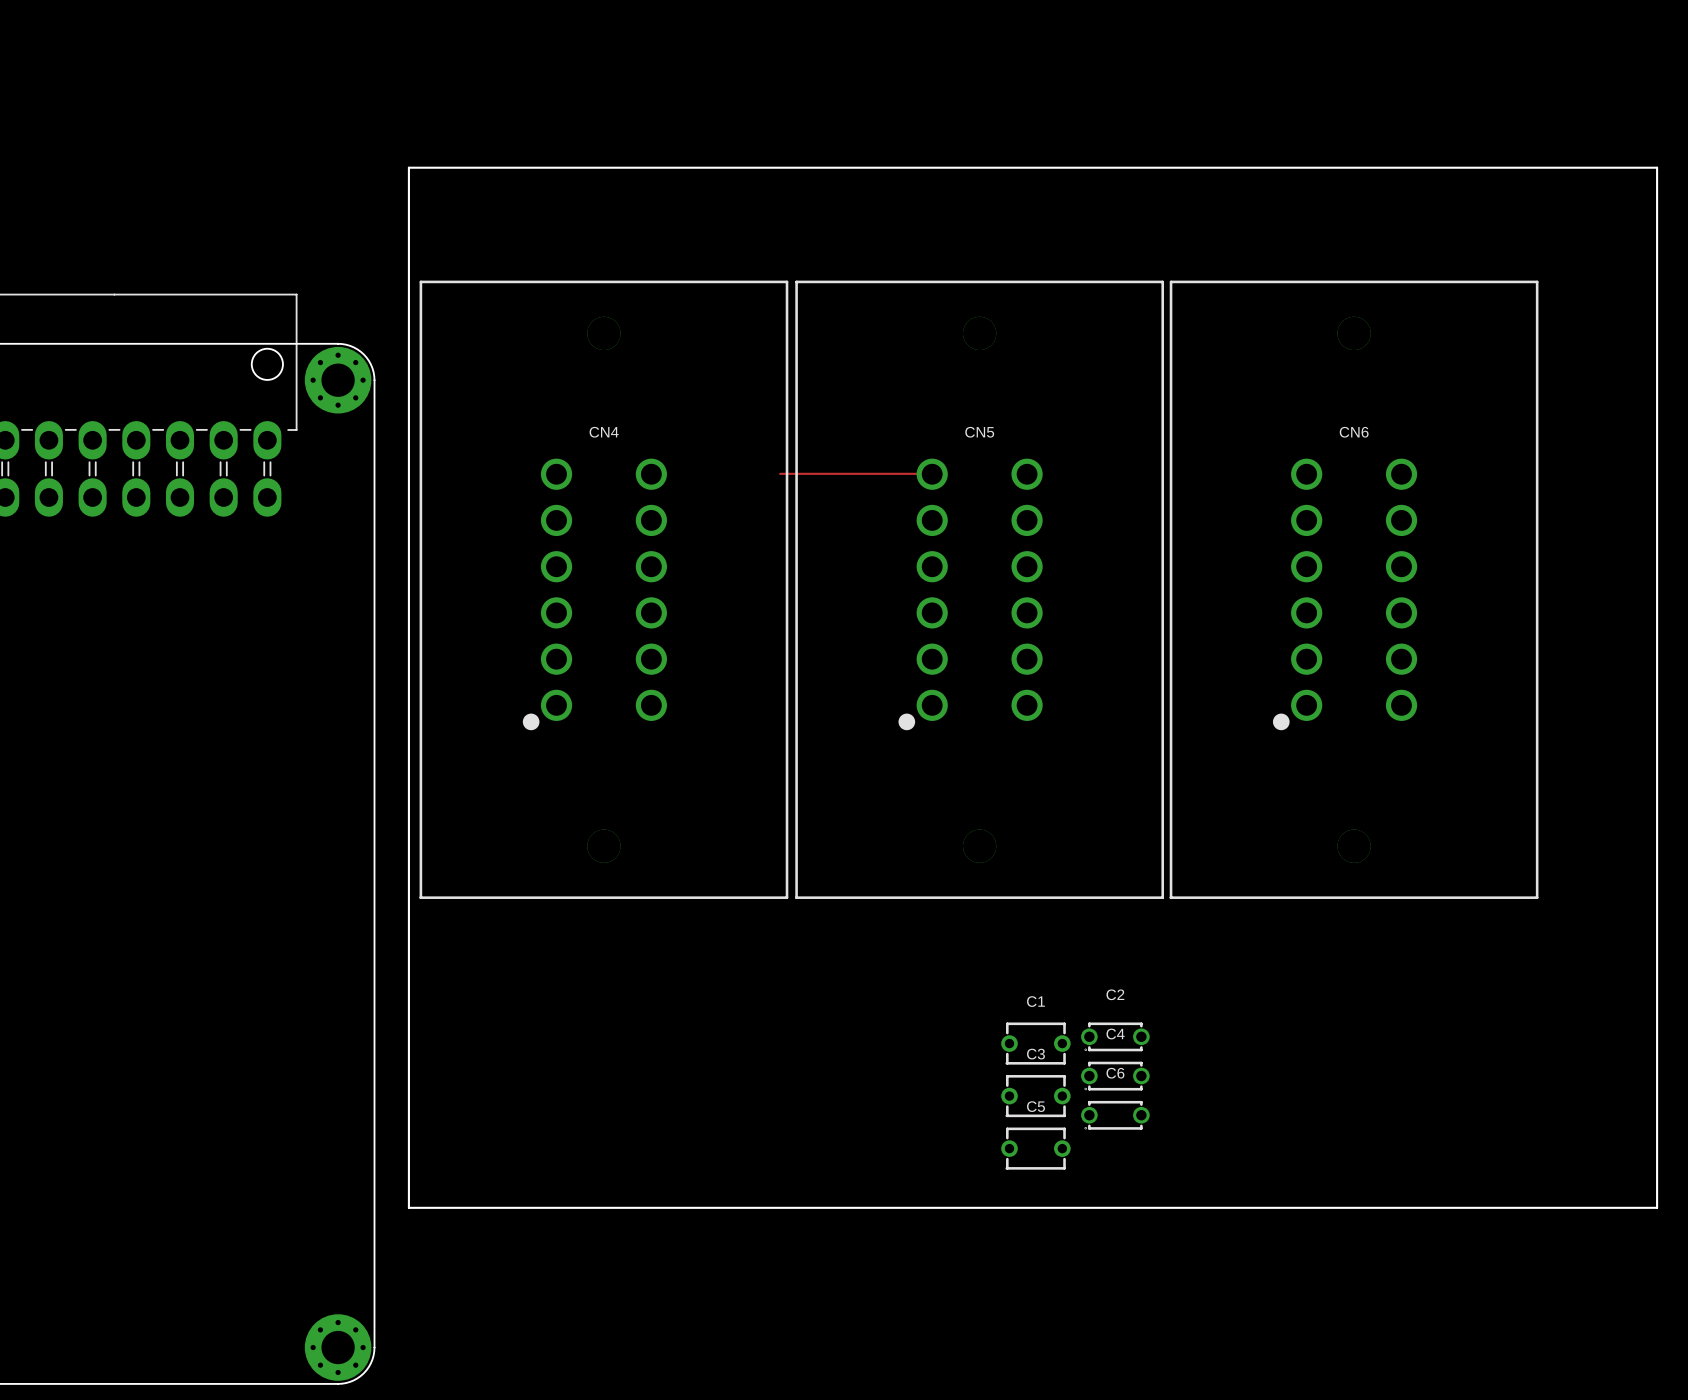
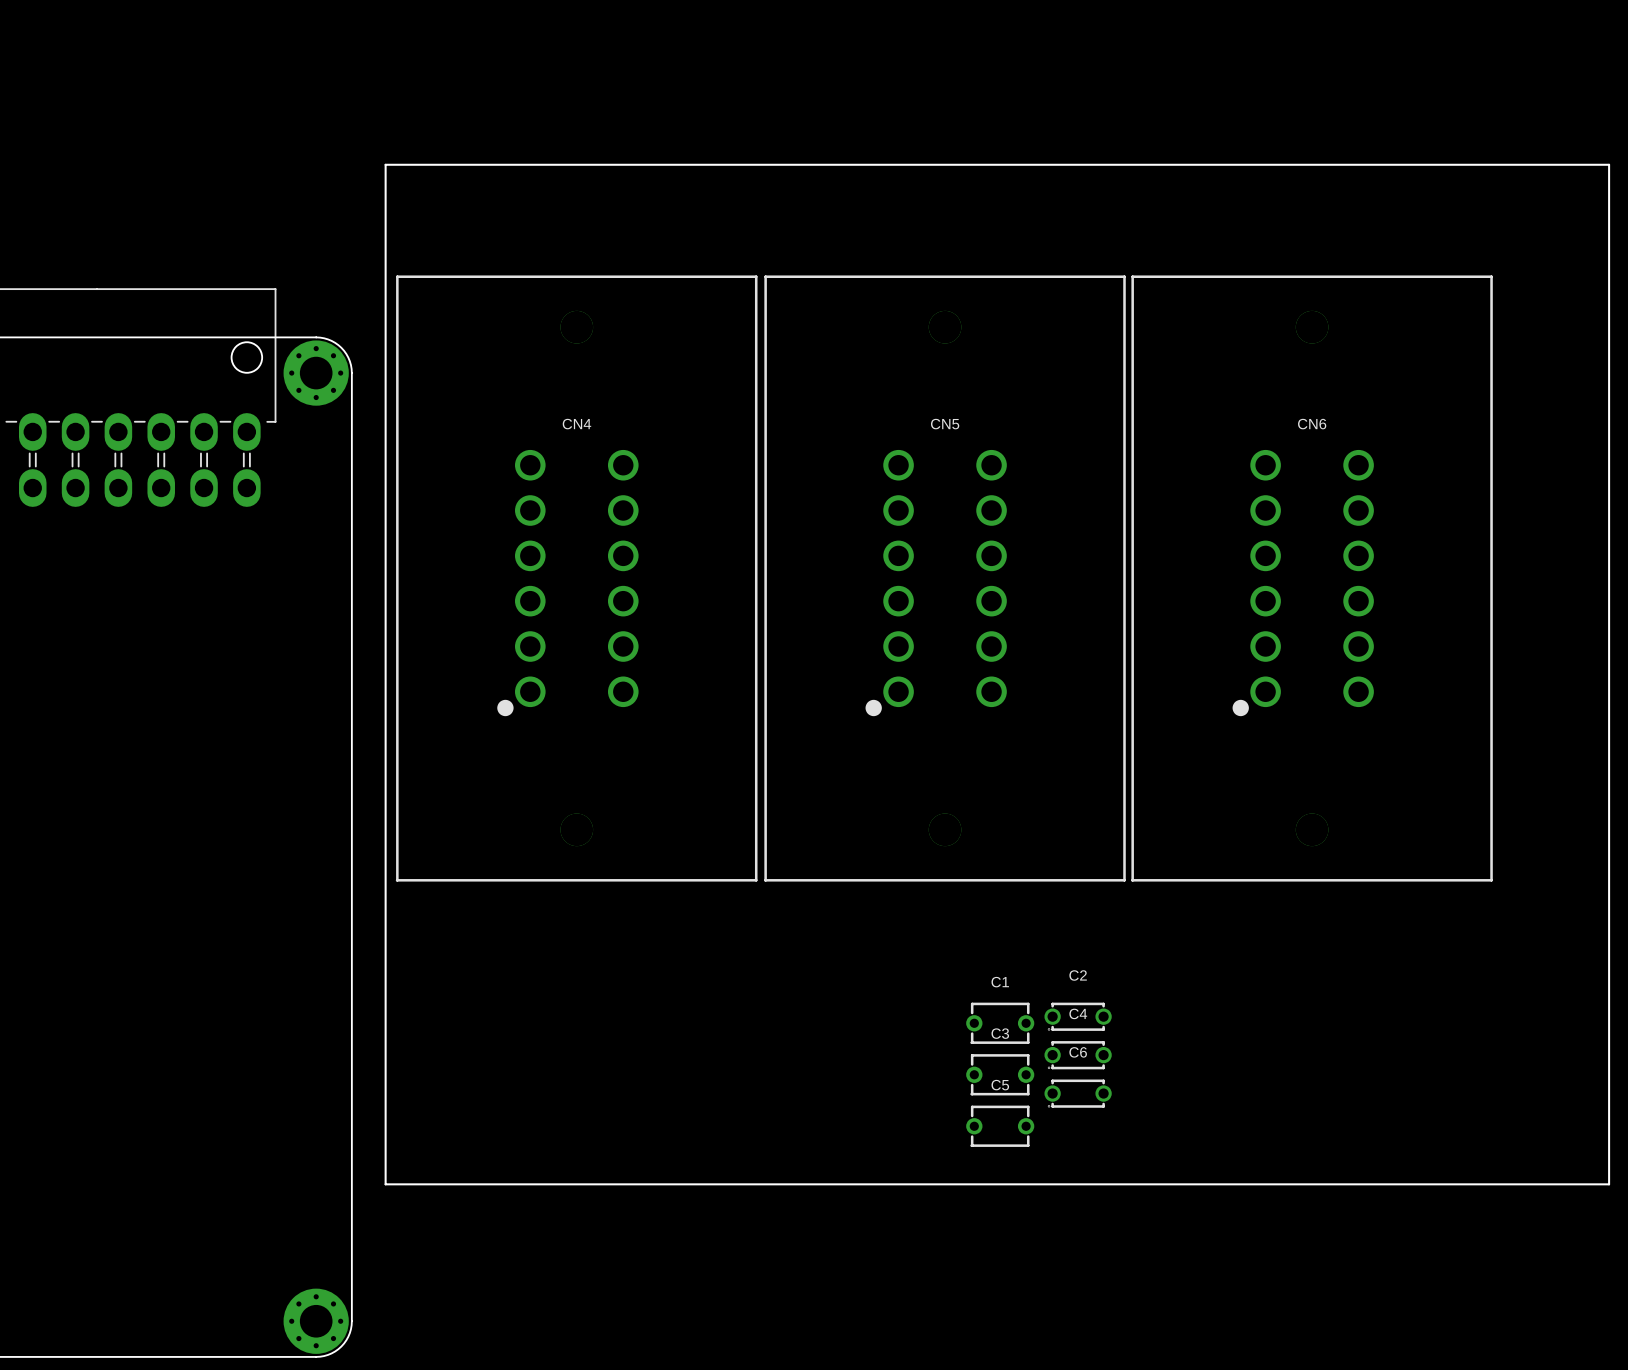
track: (780, 473) (932, 474) -> none

